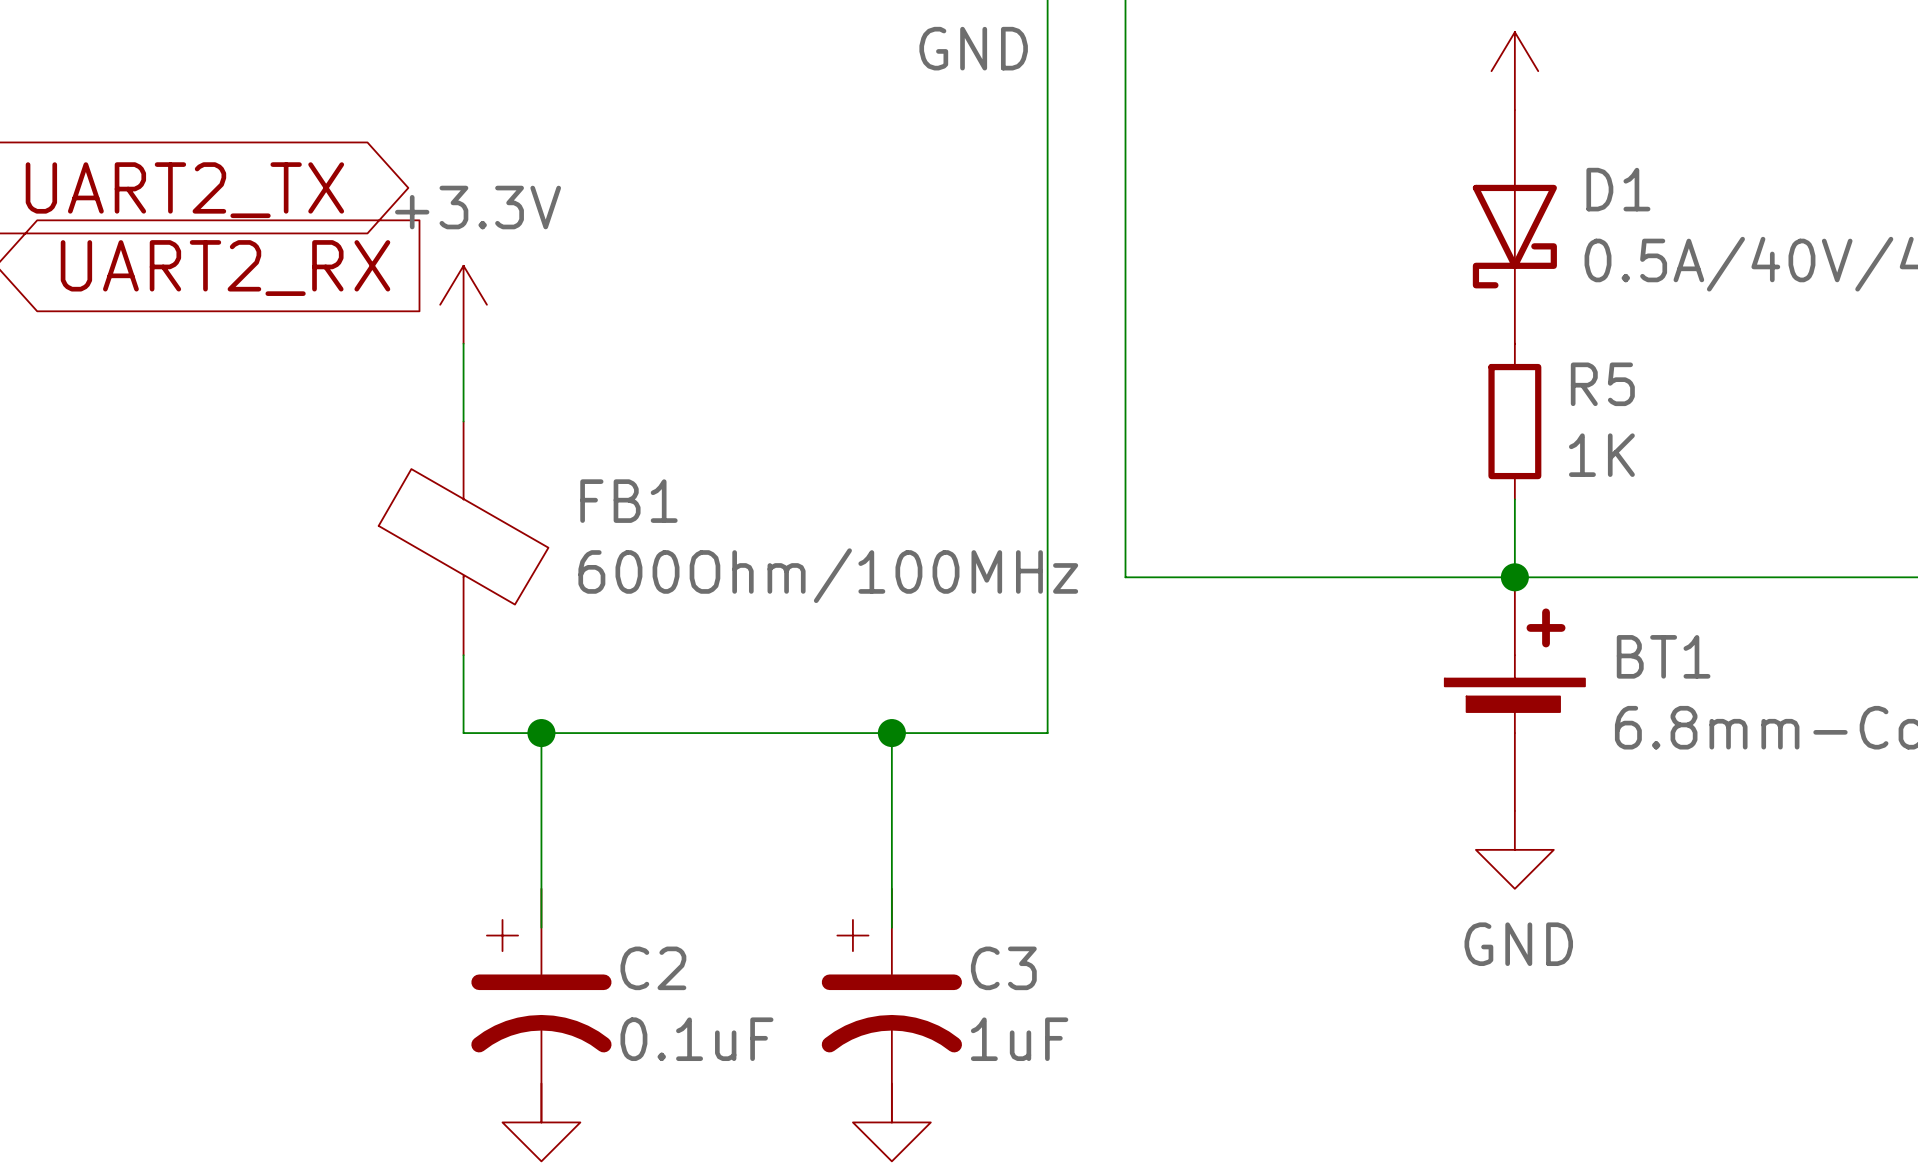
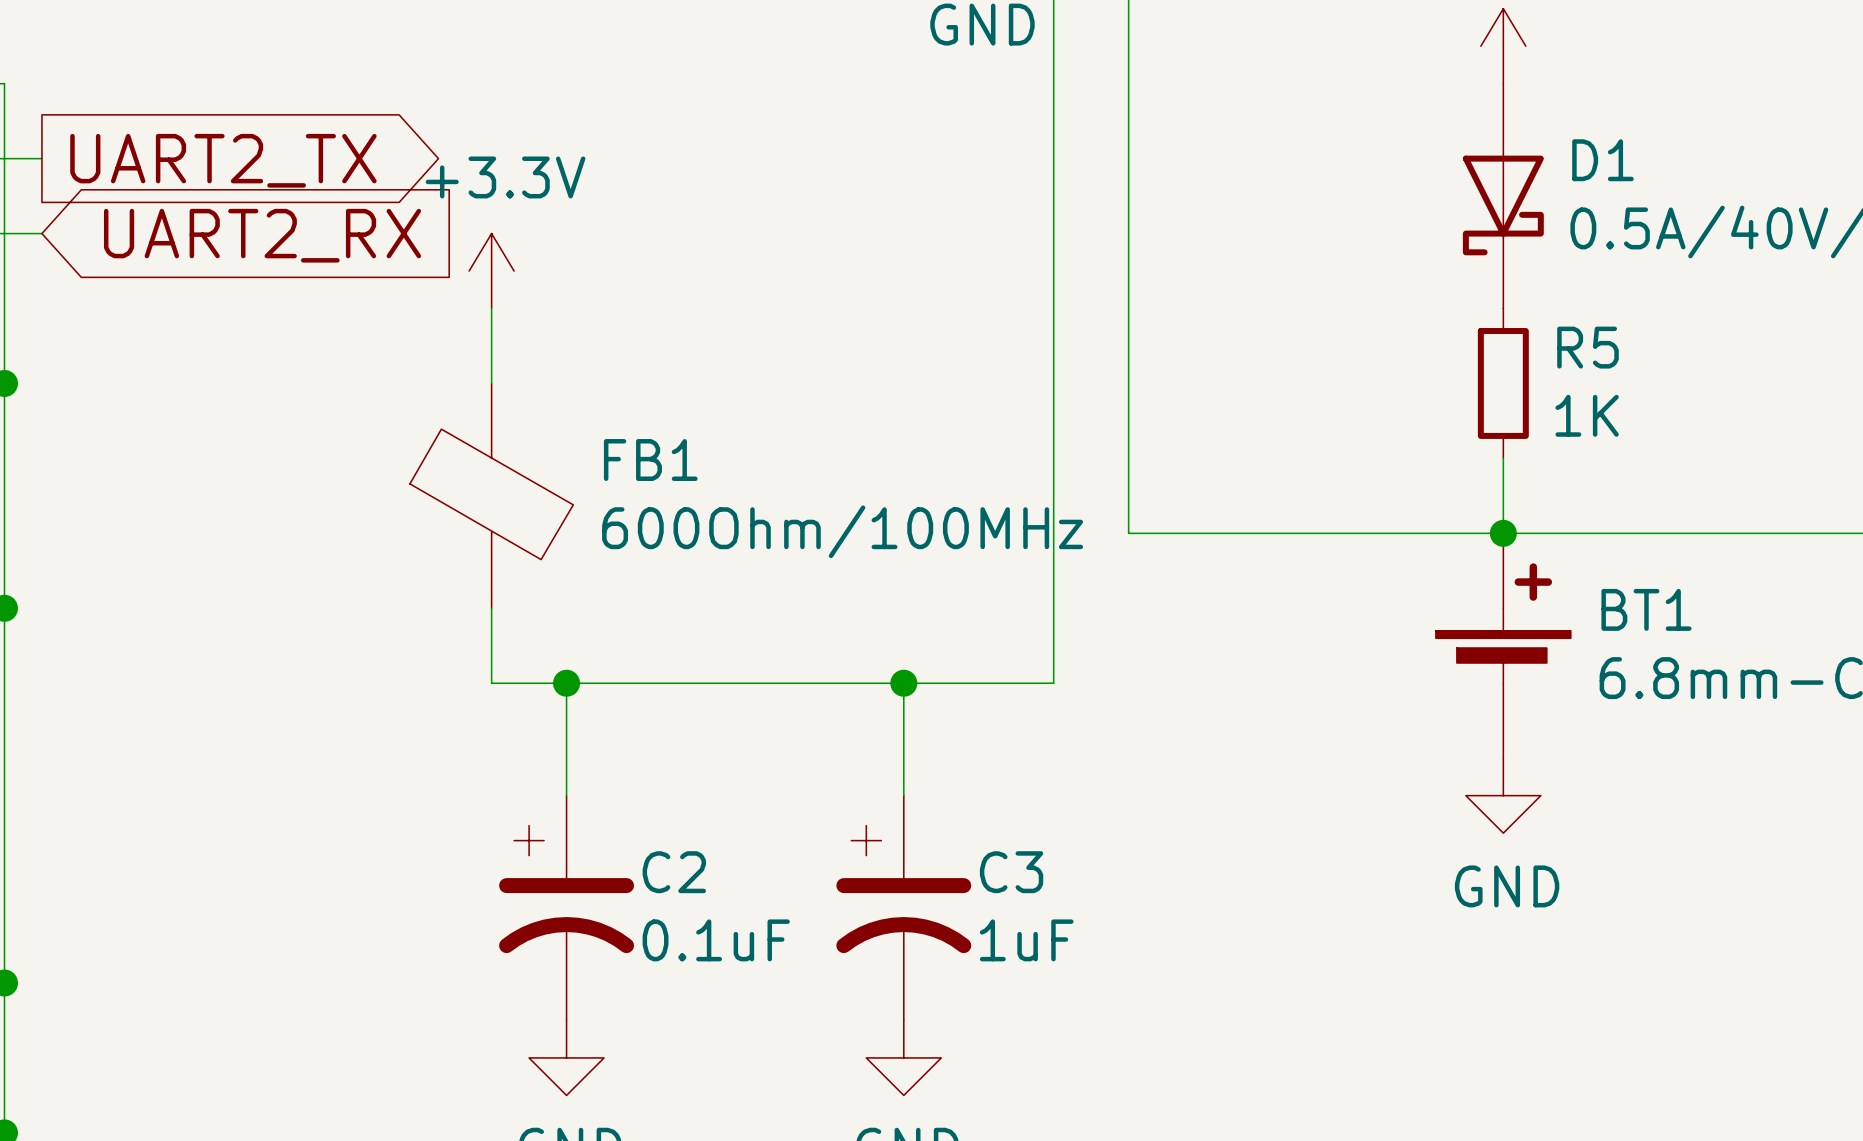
C2 position: (541, 1005) -> (566, 908)
C3 position: (891, 1005) -> (903, 908)

